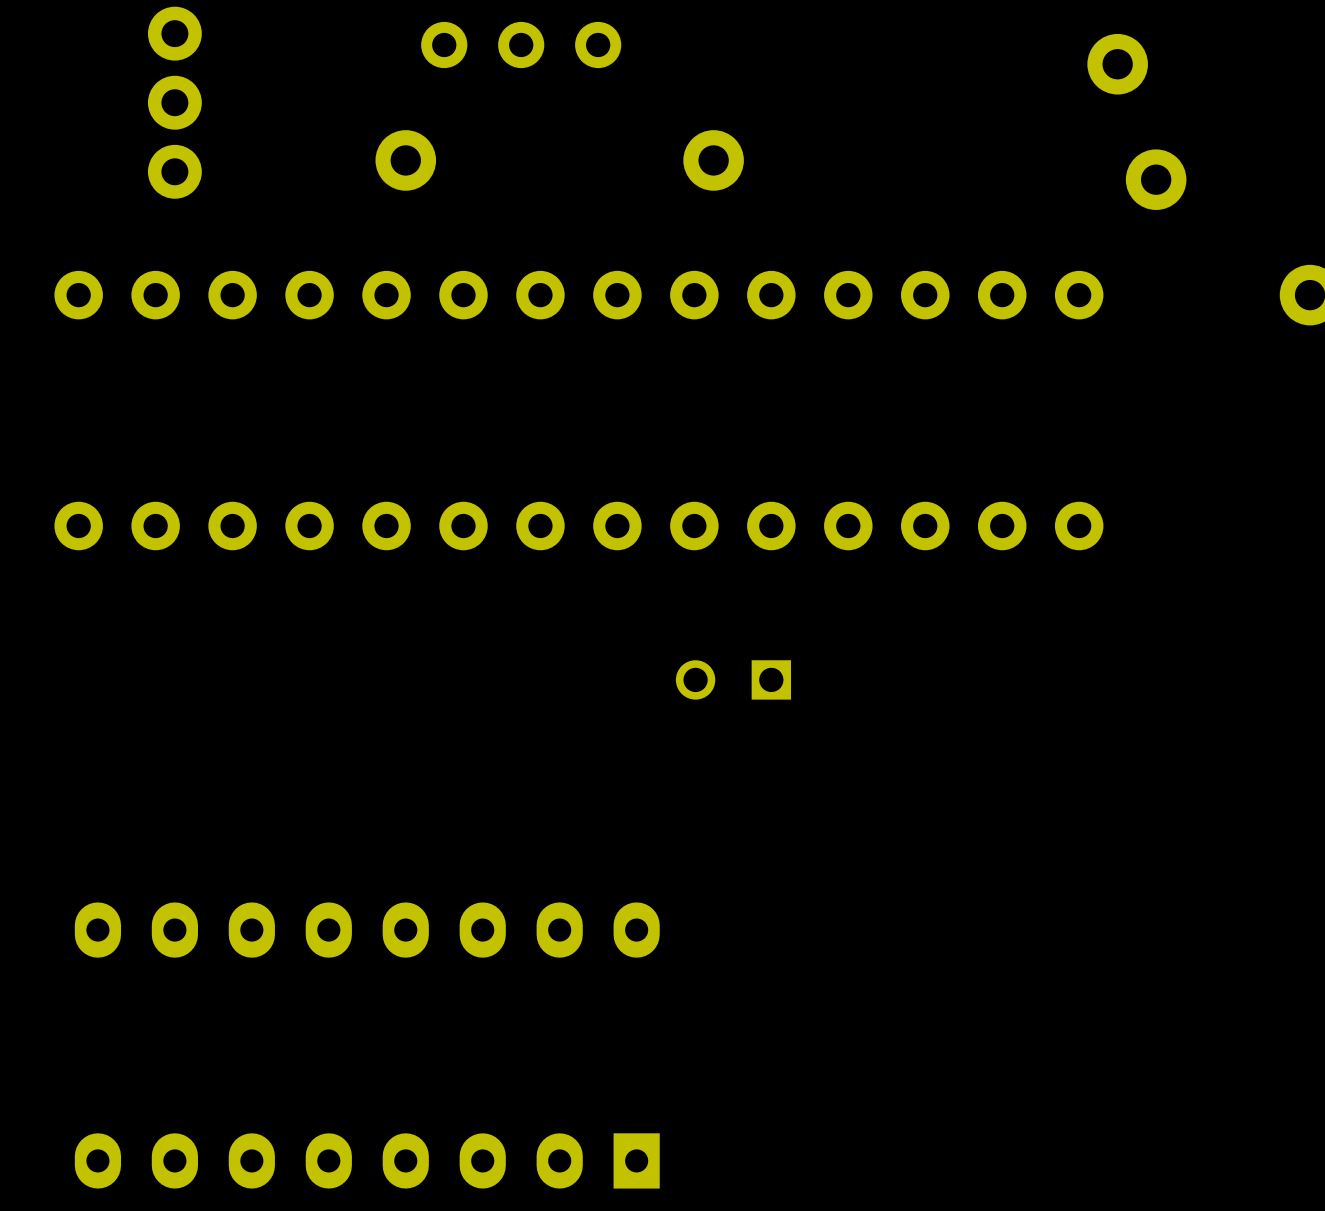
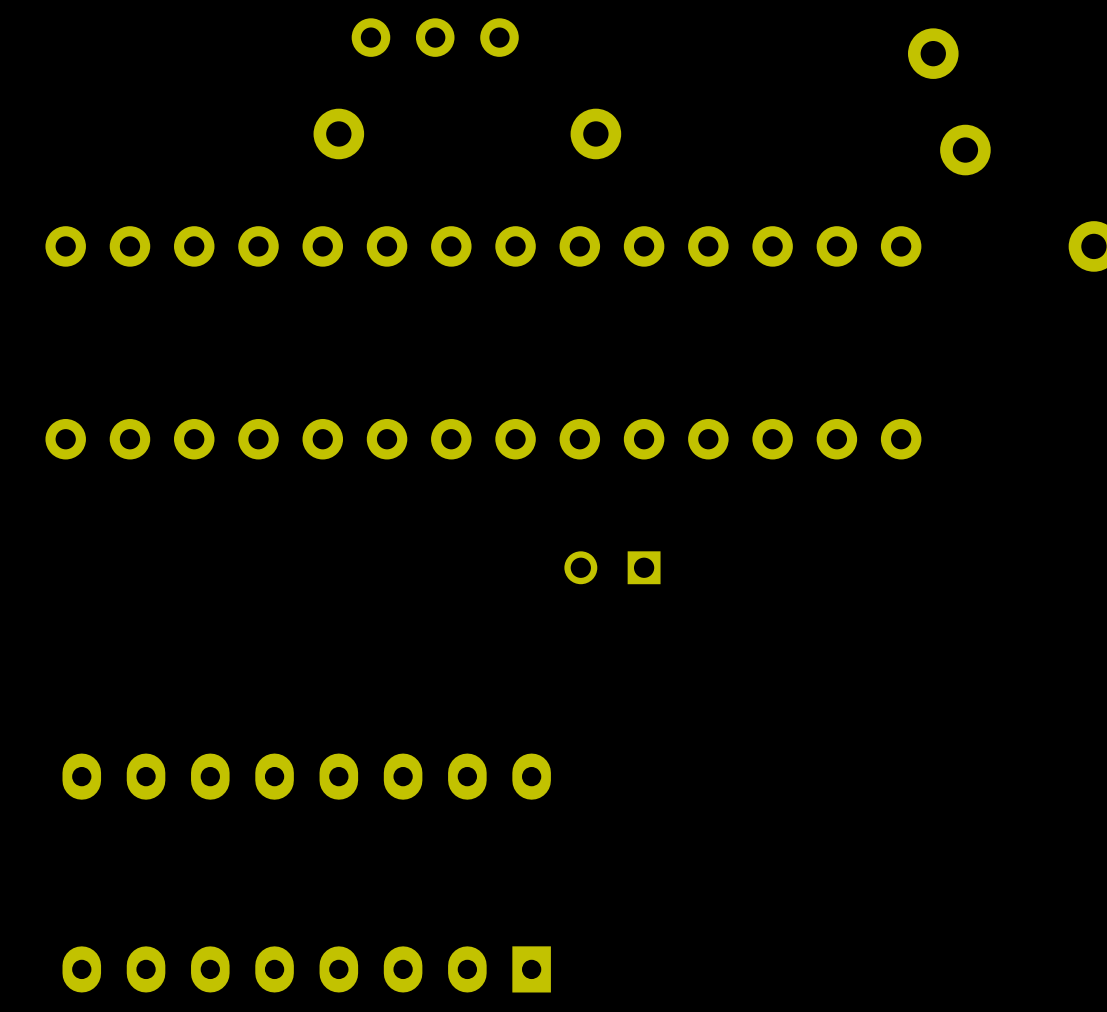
part: (174, 102) -> none

